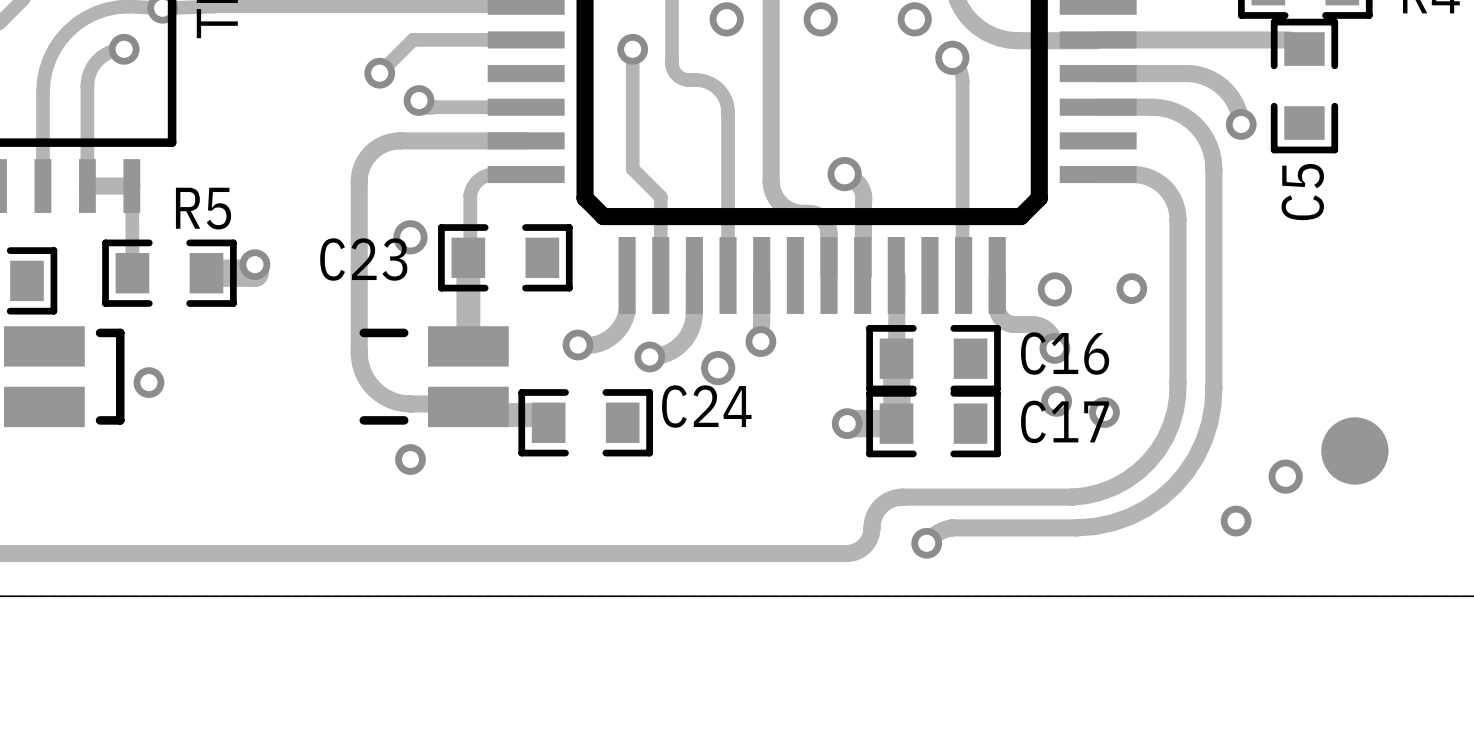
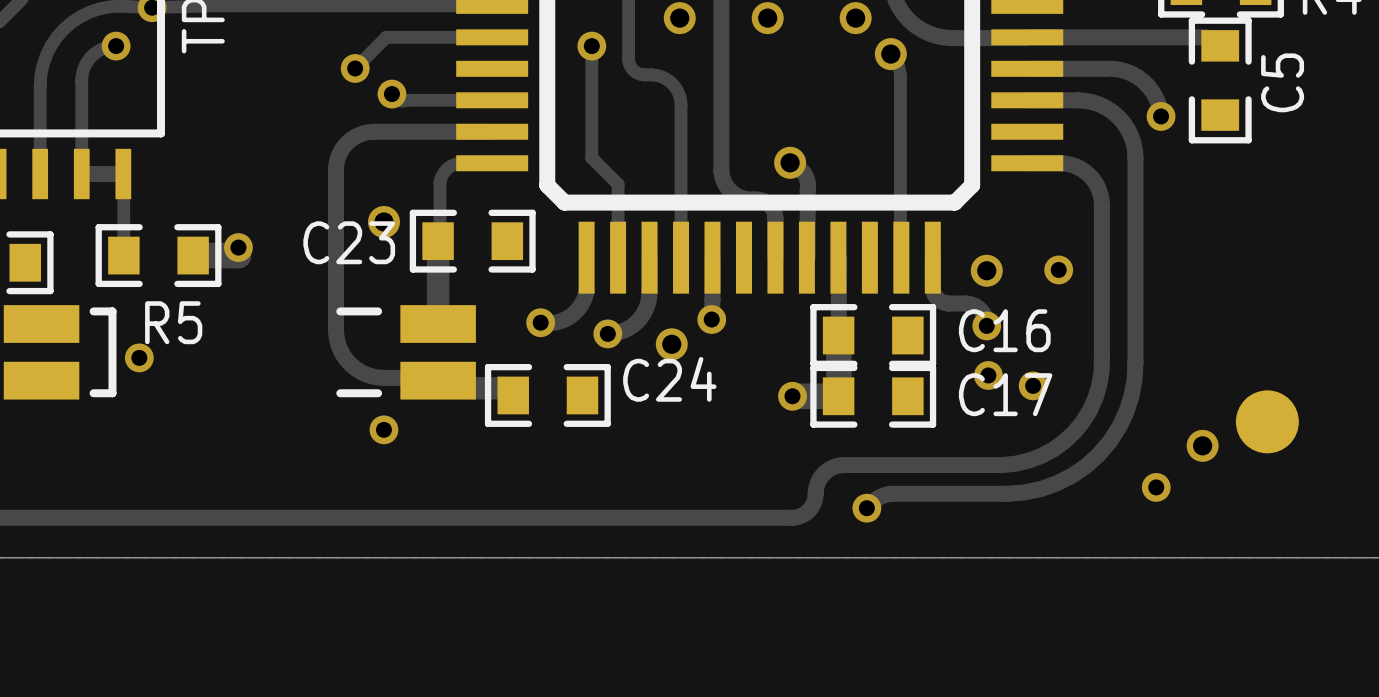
C5 name position: C5 (1302, 192) -> C5 (1282, 82)
R5 name position: R5 (203, 208) -> R5 (173, 322)

